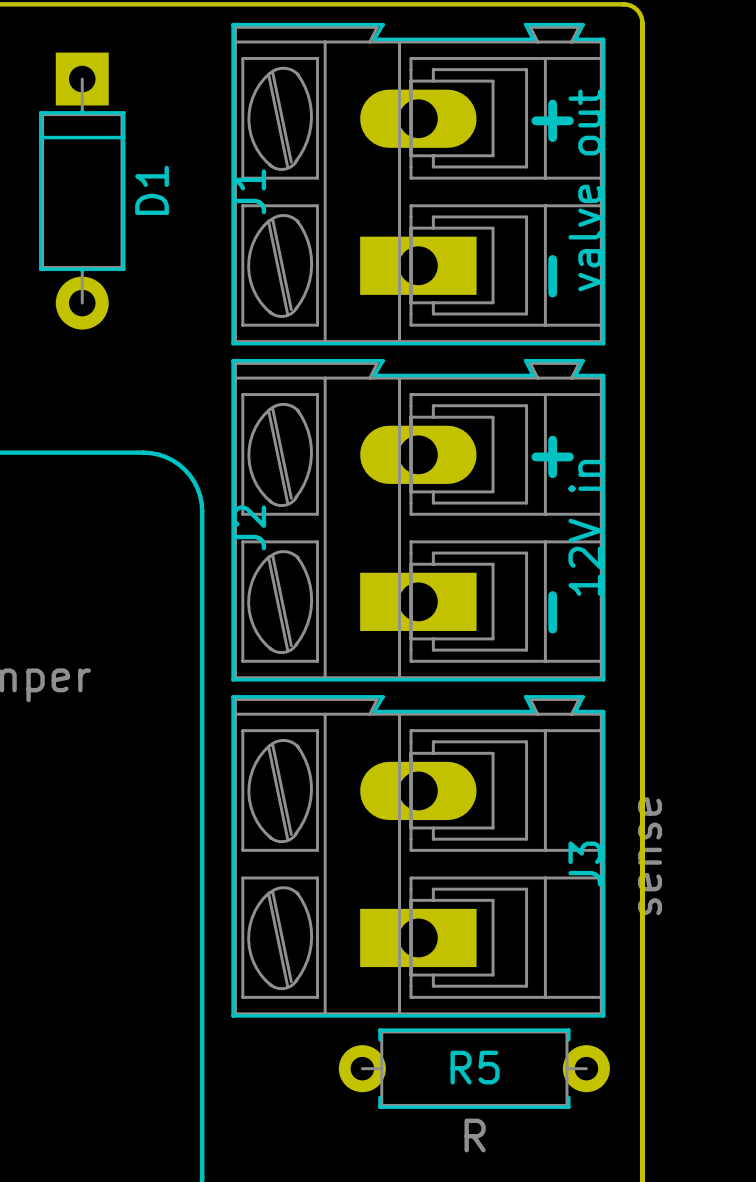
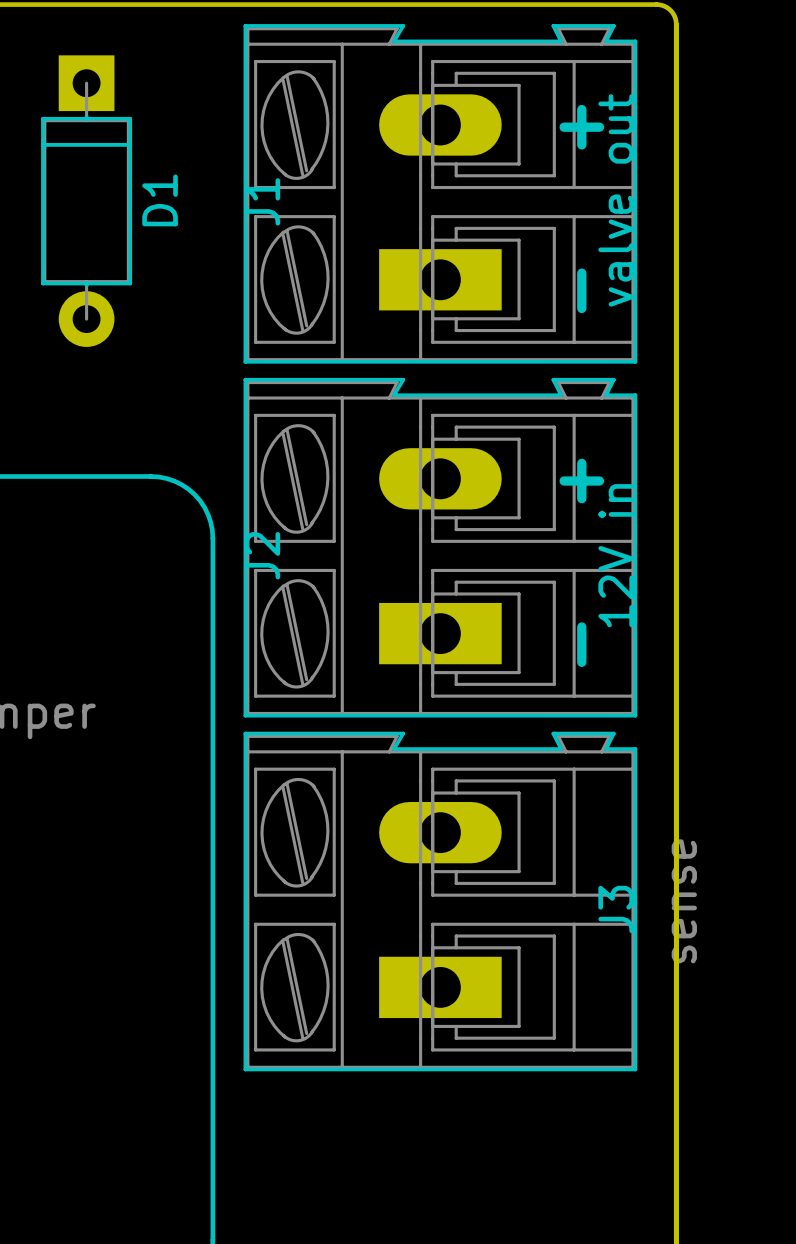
R5: R (474, 1068) -> none

